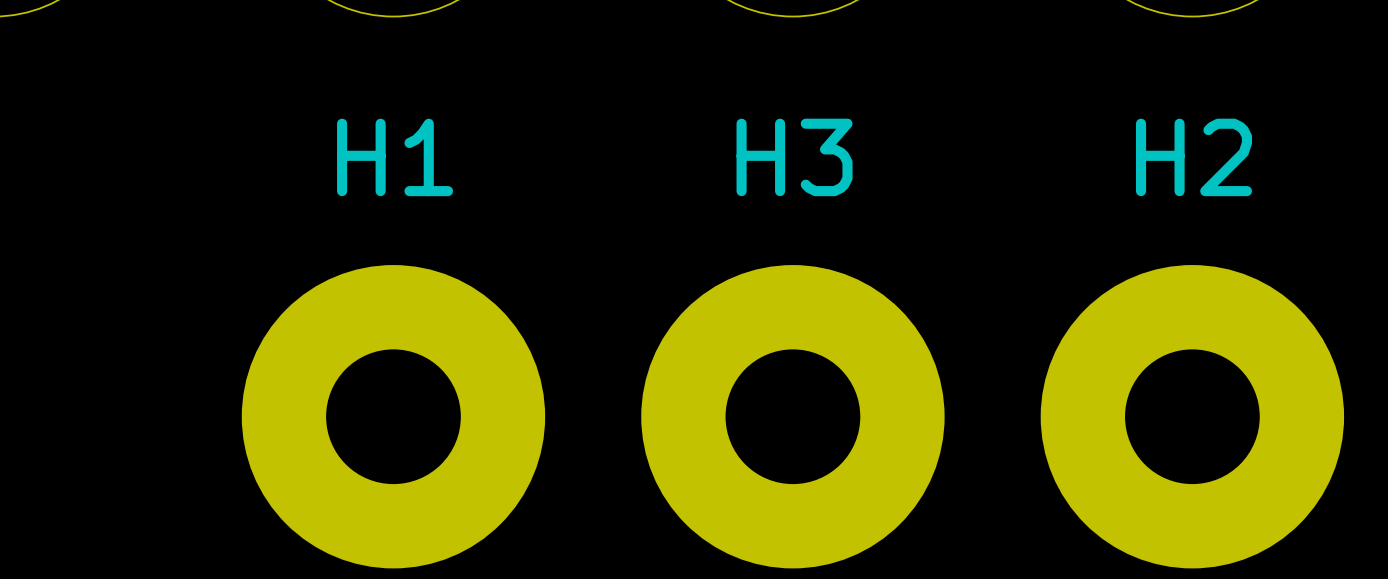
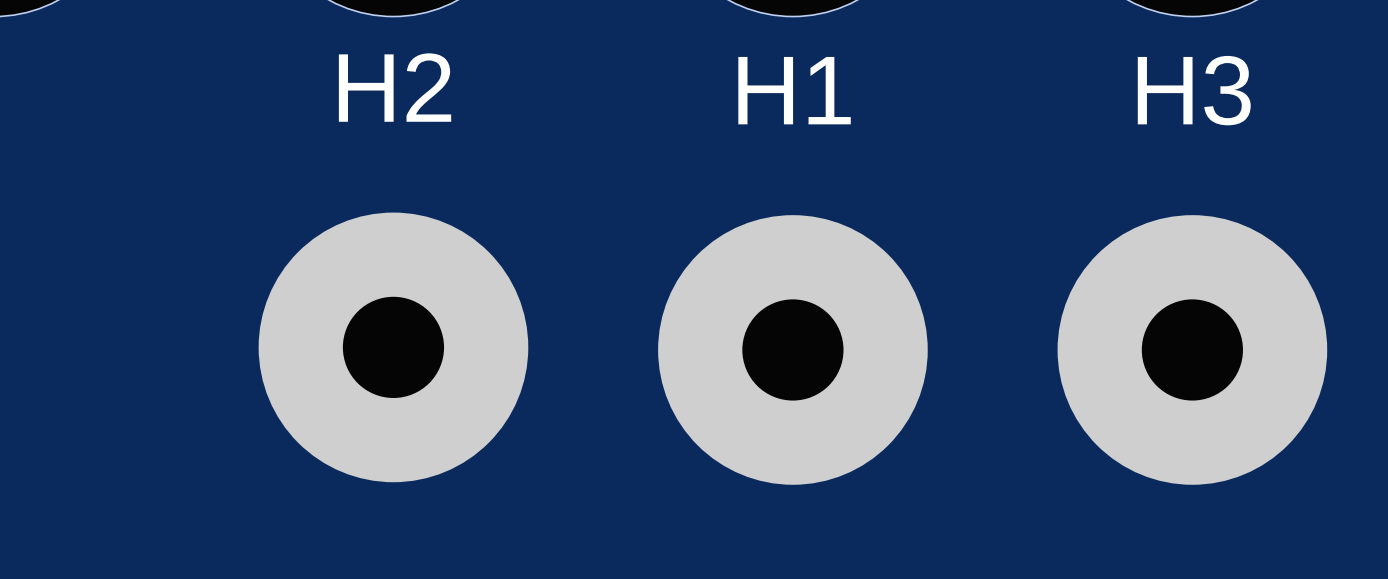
H1 footprint: [241, 265, 546, 569] -> [658, 215, 928, 485]
H3 footprint: [641, 265, 945, 569] -> [1057, 215, 1328, 485]
H2 footprint: [1040, 265, 1345, 569] -> [258, 212, 529, 483]

